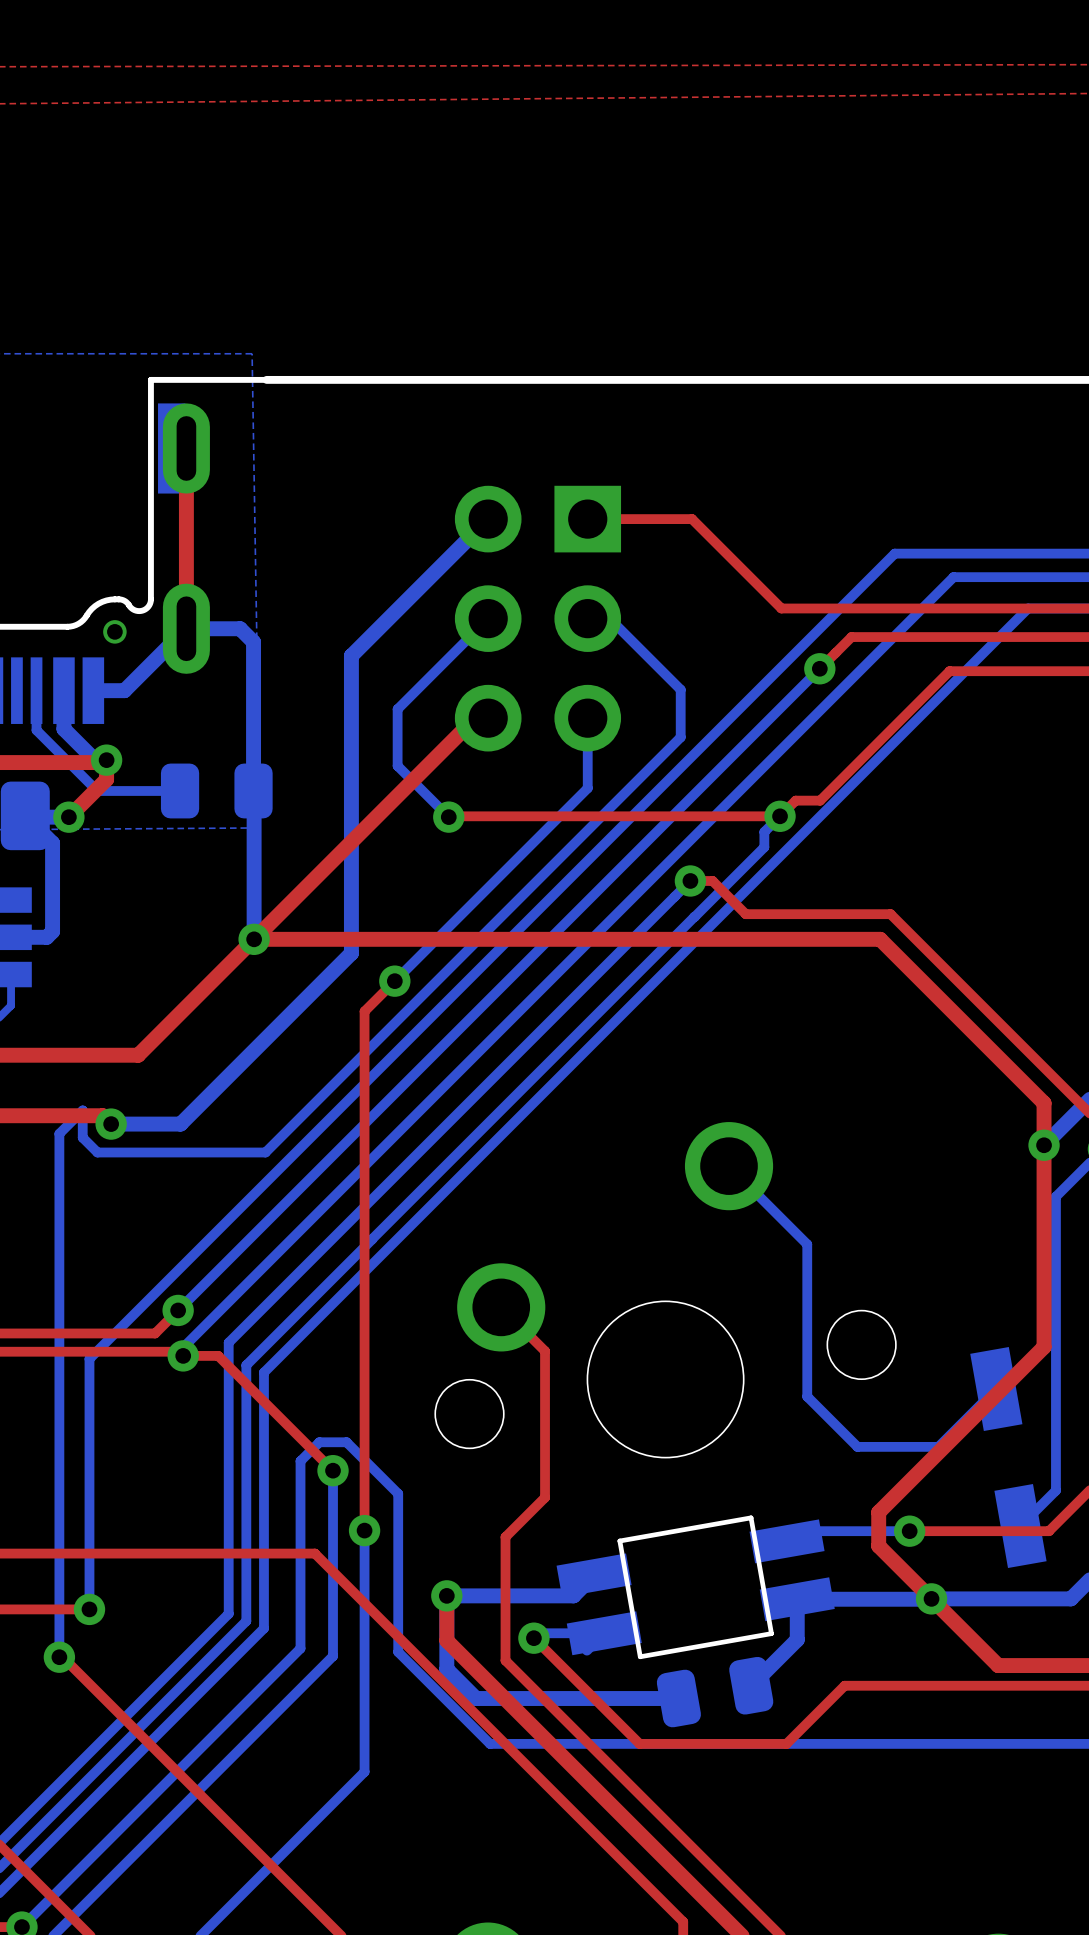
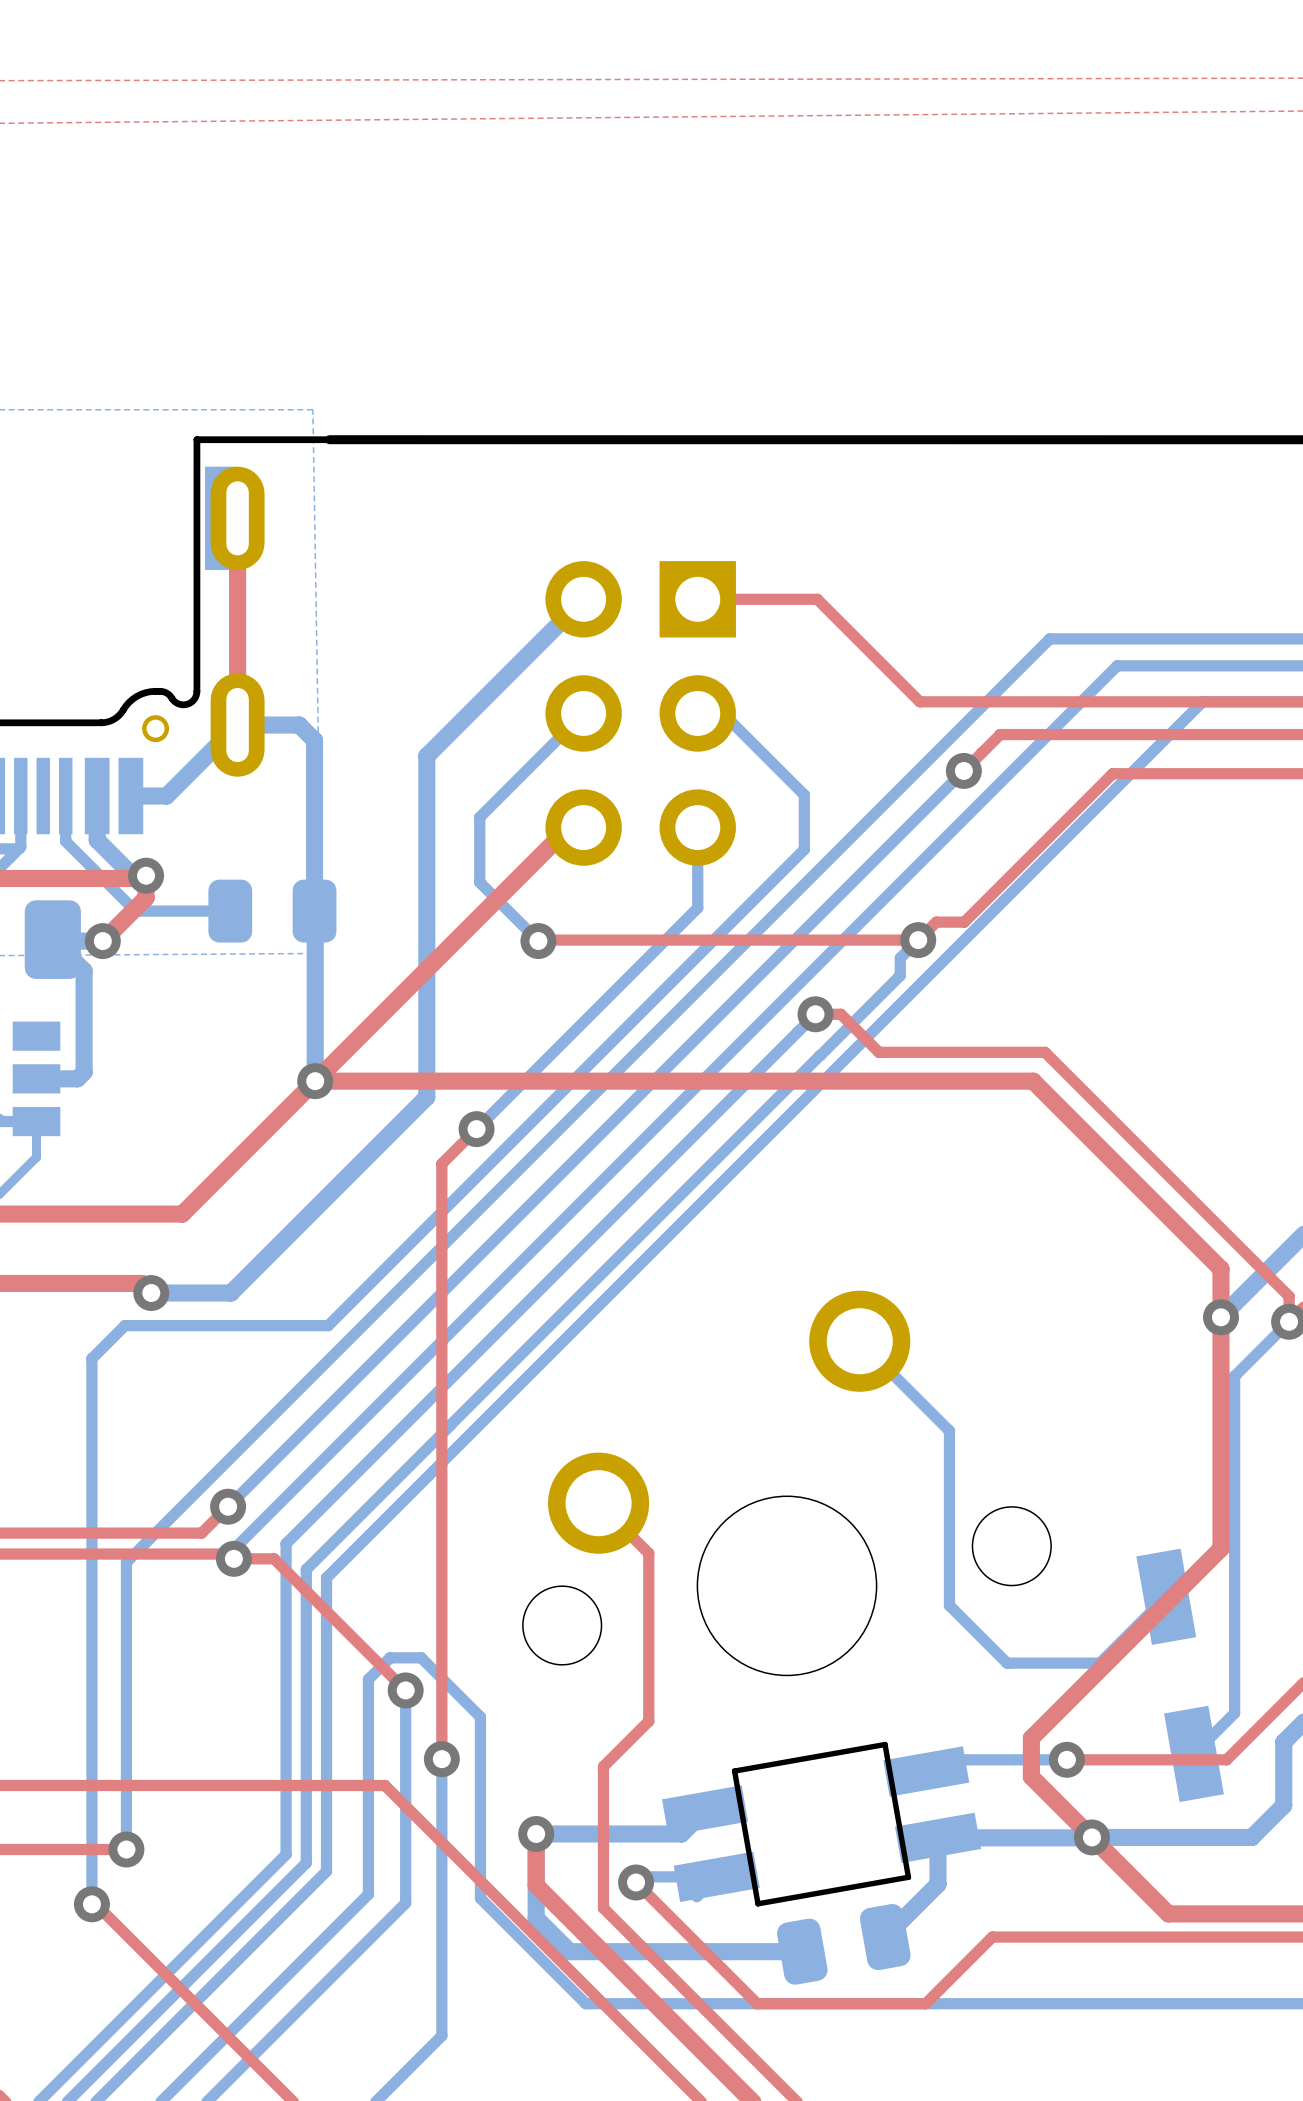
bottom track: (97, 1152) (82, 1137) (82, 1110) (59, 1133) (59, 1181) -> (135, 1325) (124, 1325) (91, 1358)

